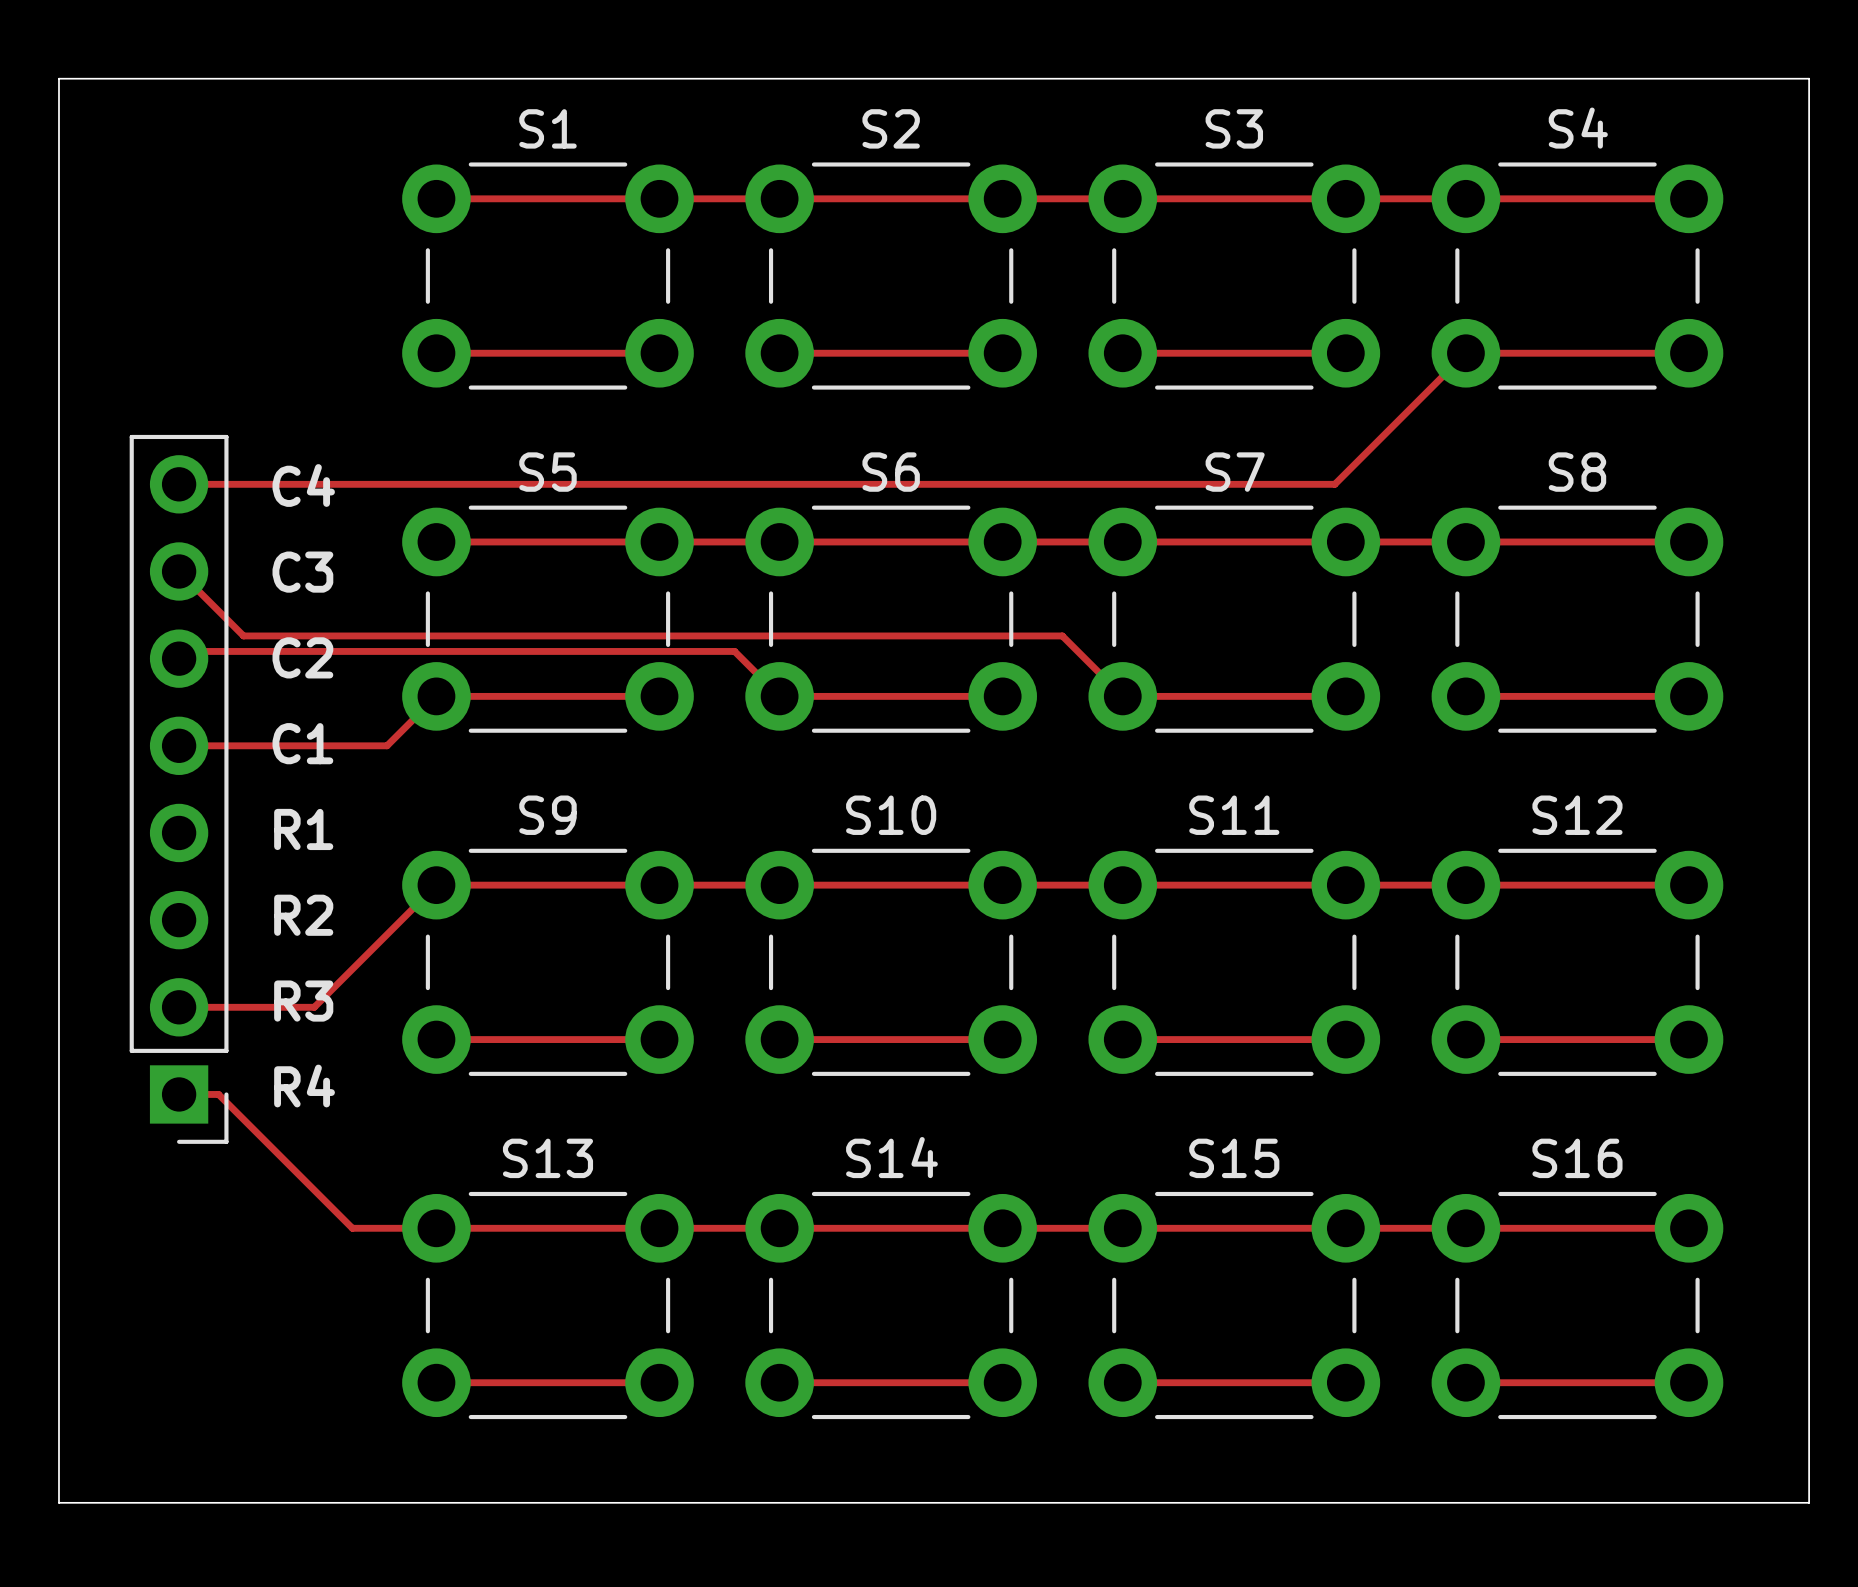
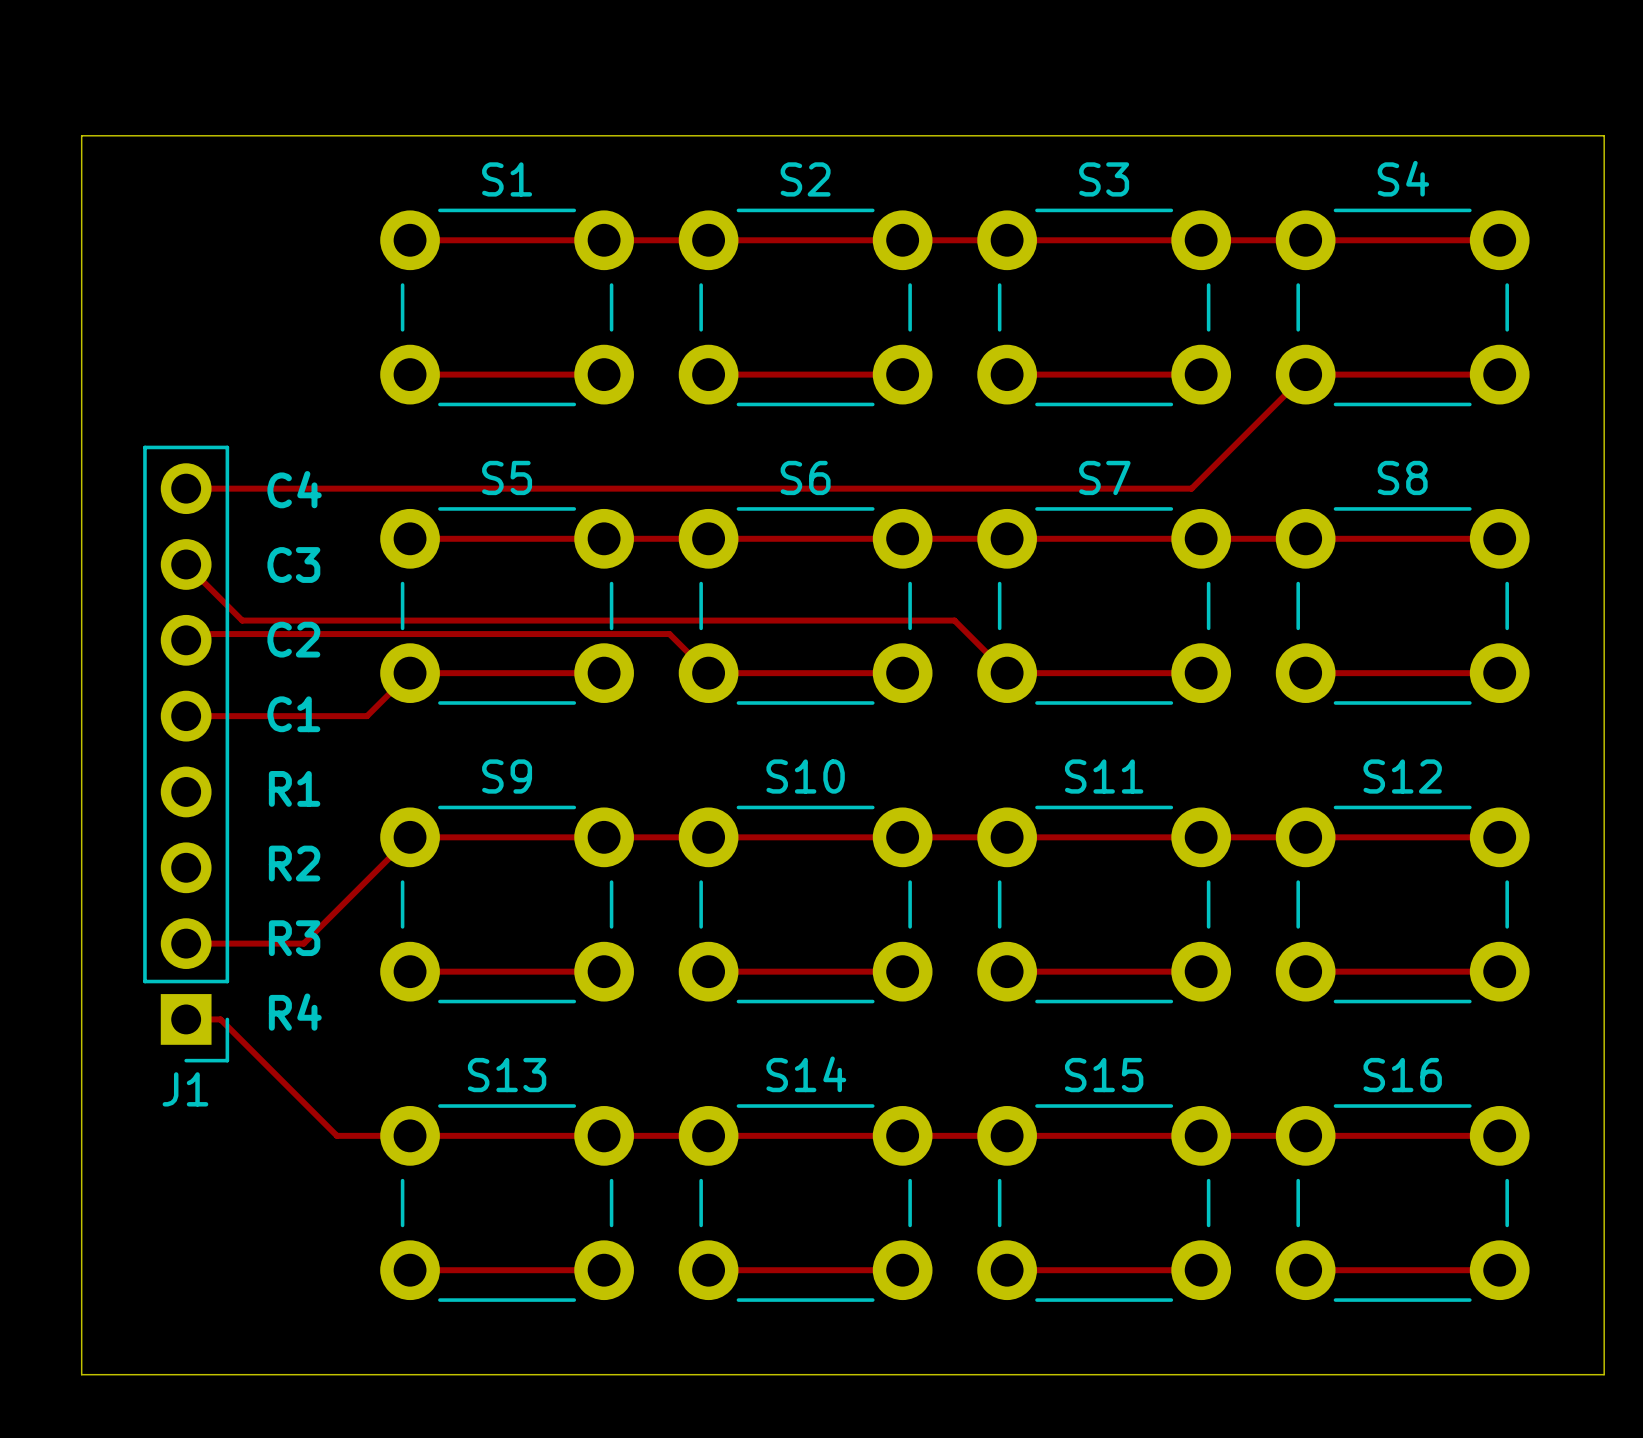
J1 name: none -> J1 (185, 1089)

